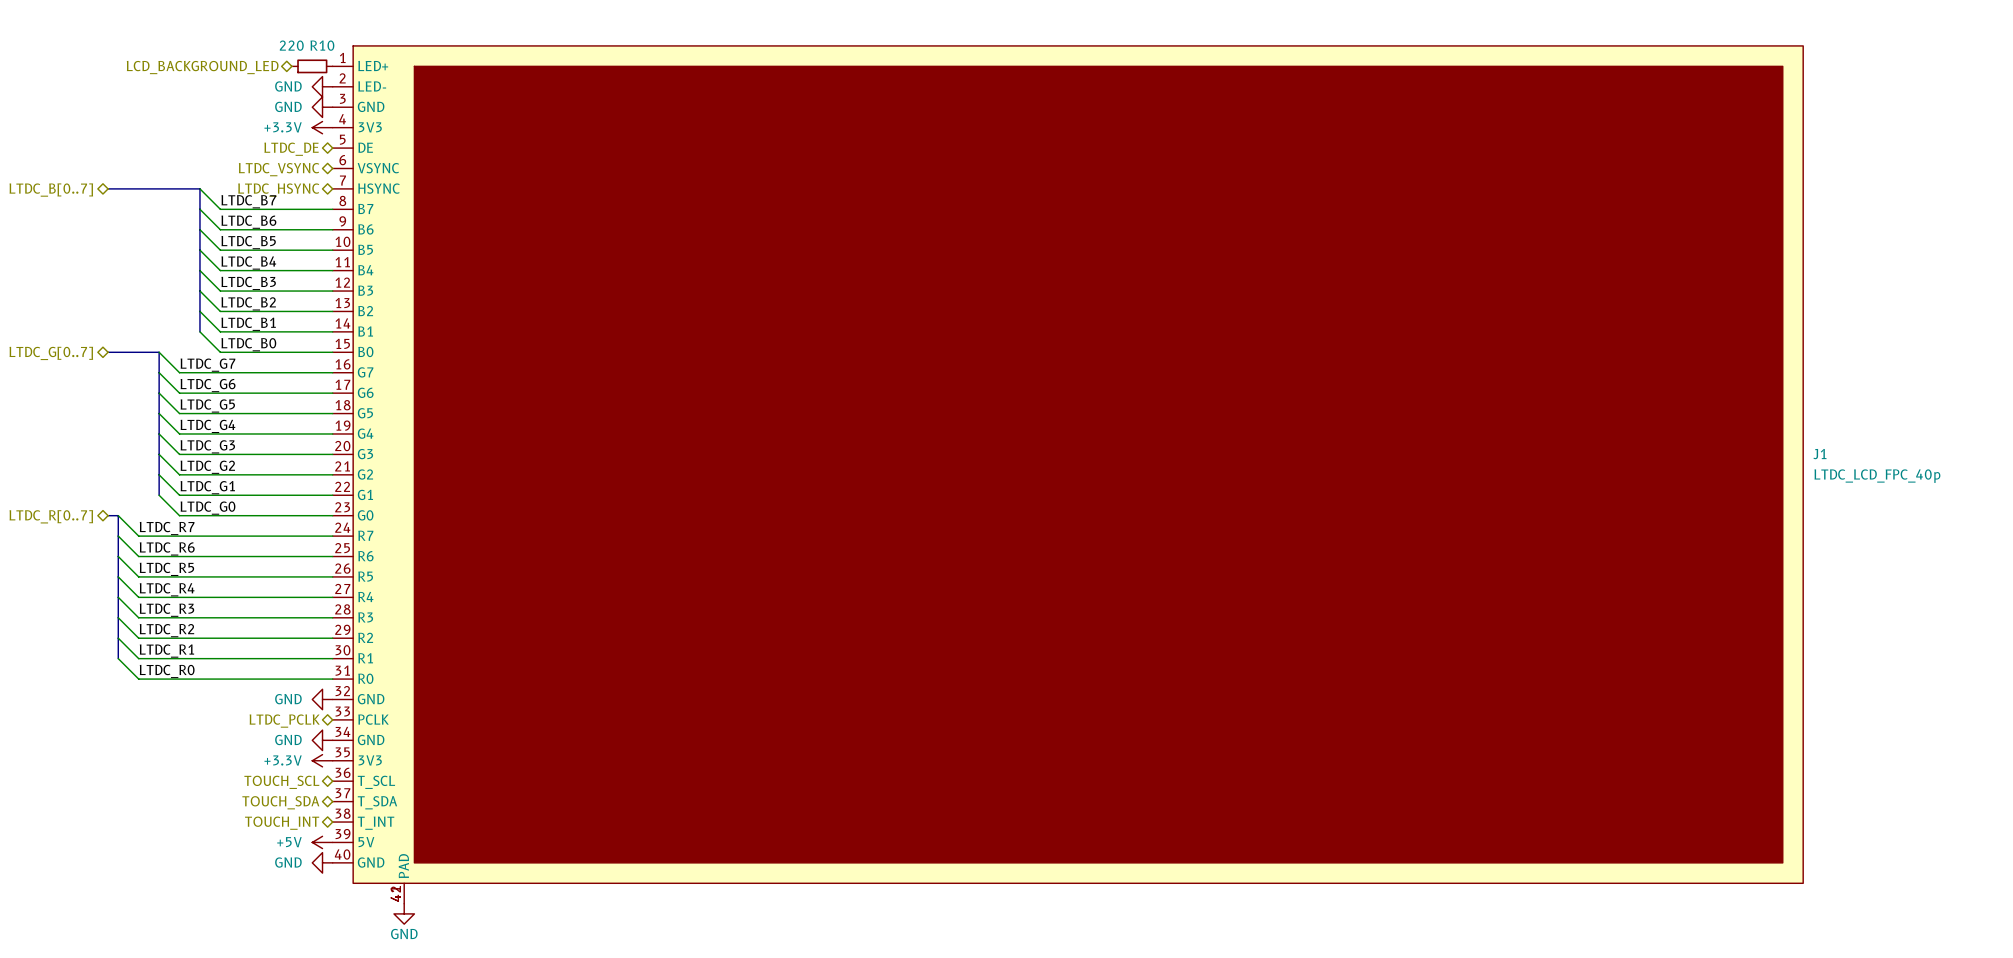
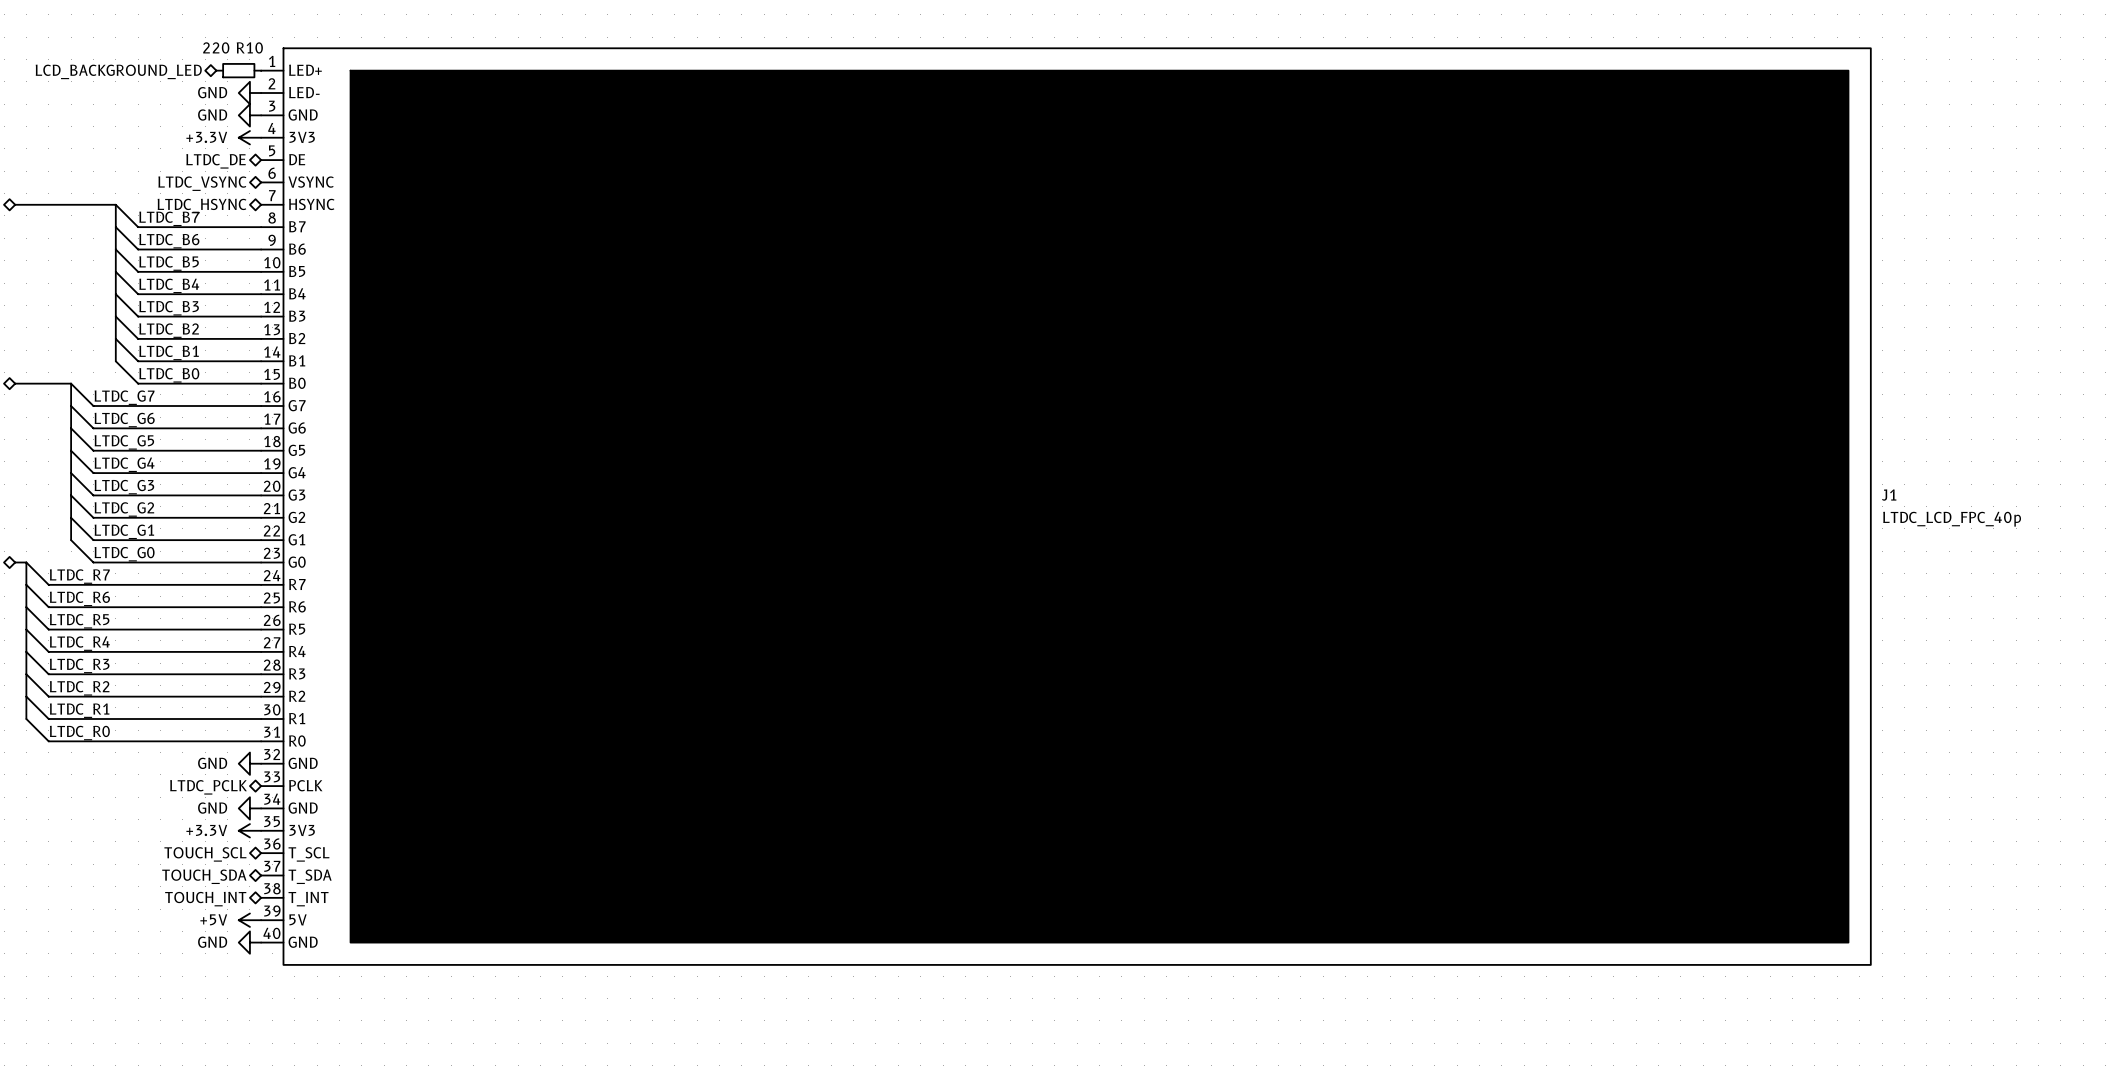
J1 symbol: [332, 45, 1804, 904] -> [261, 48, 1871, 965]
power symbol: GND (404, 913) -> none

